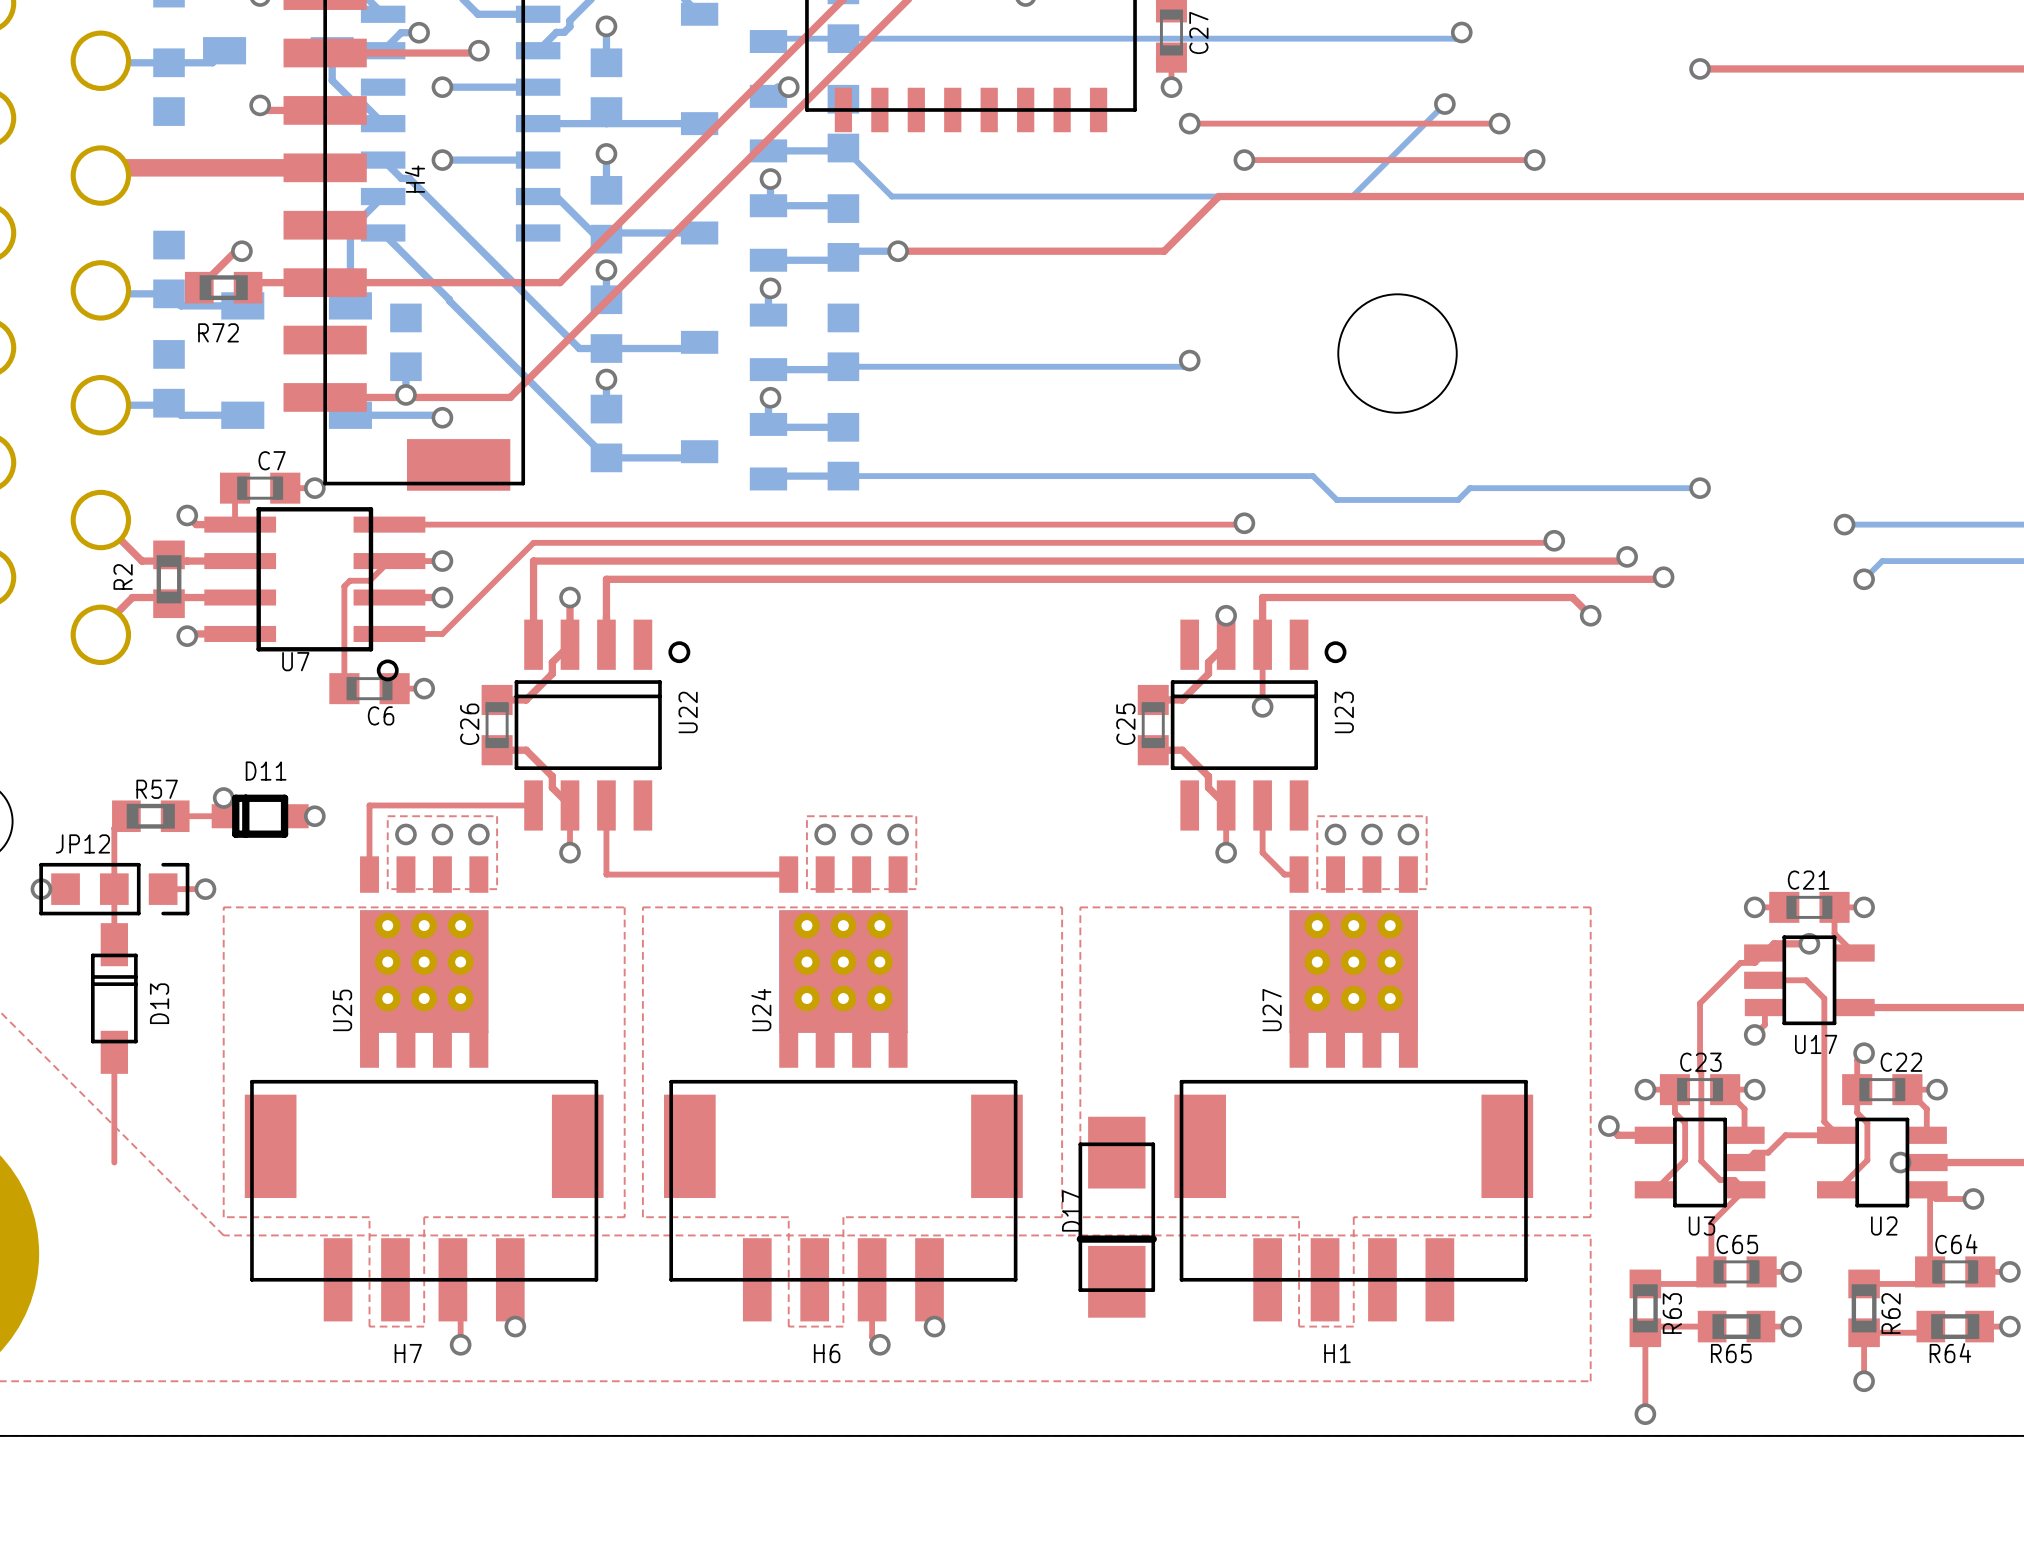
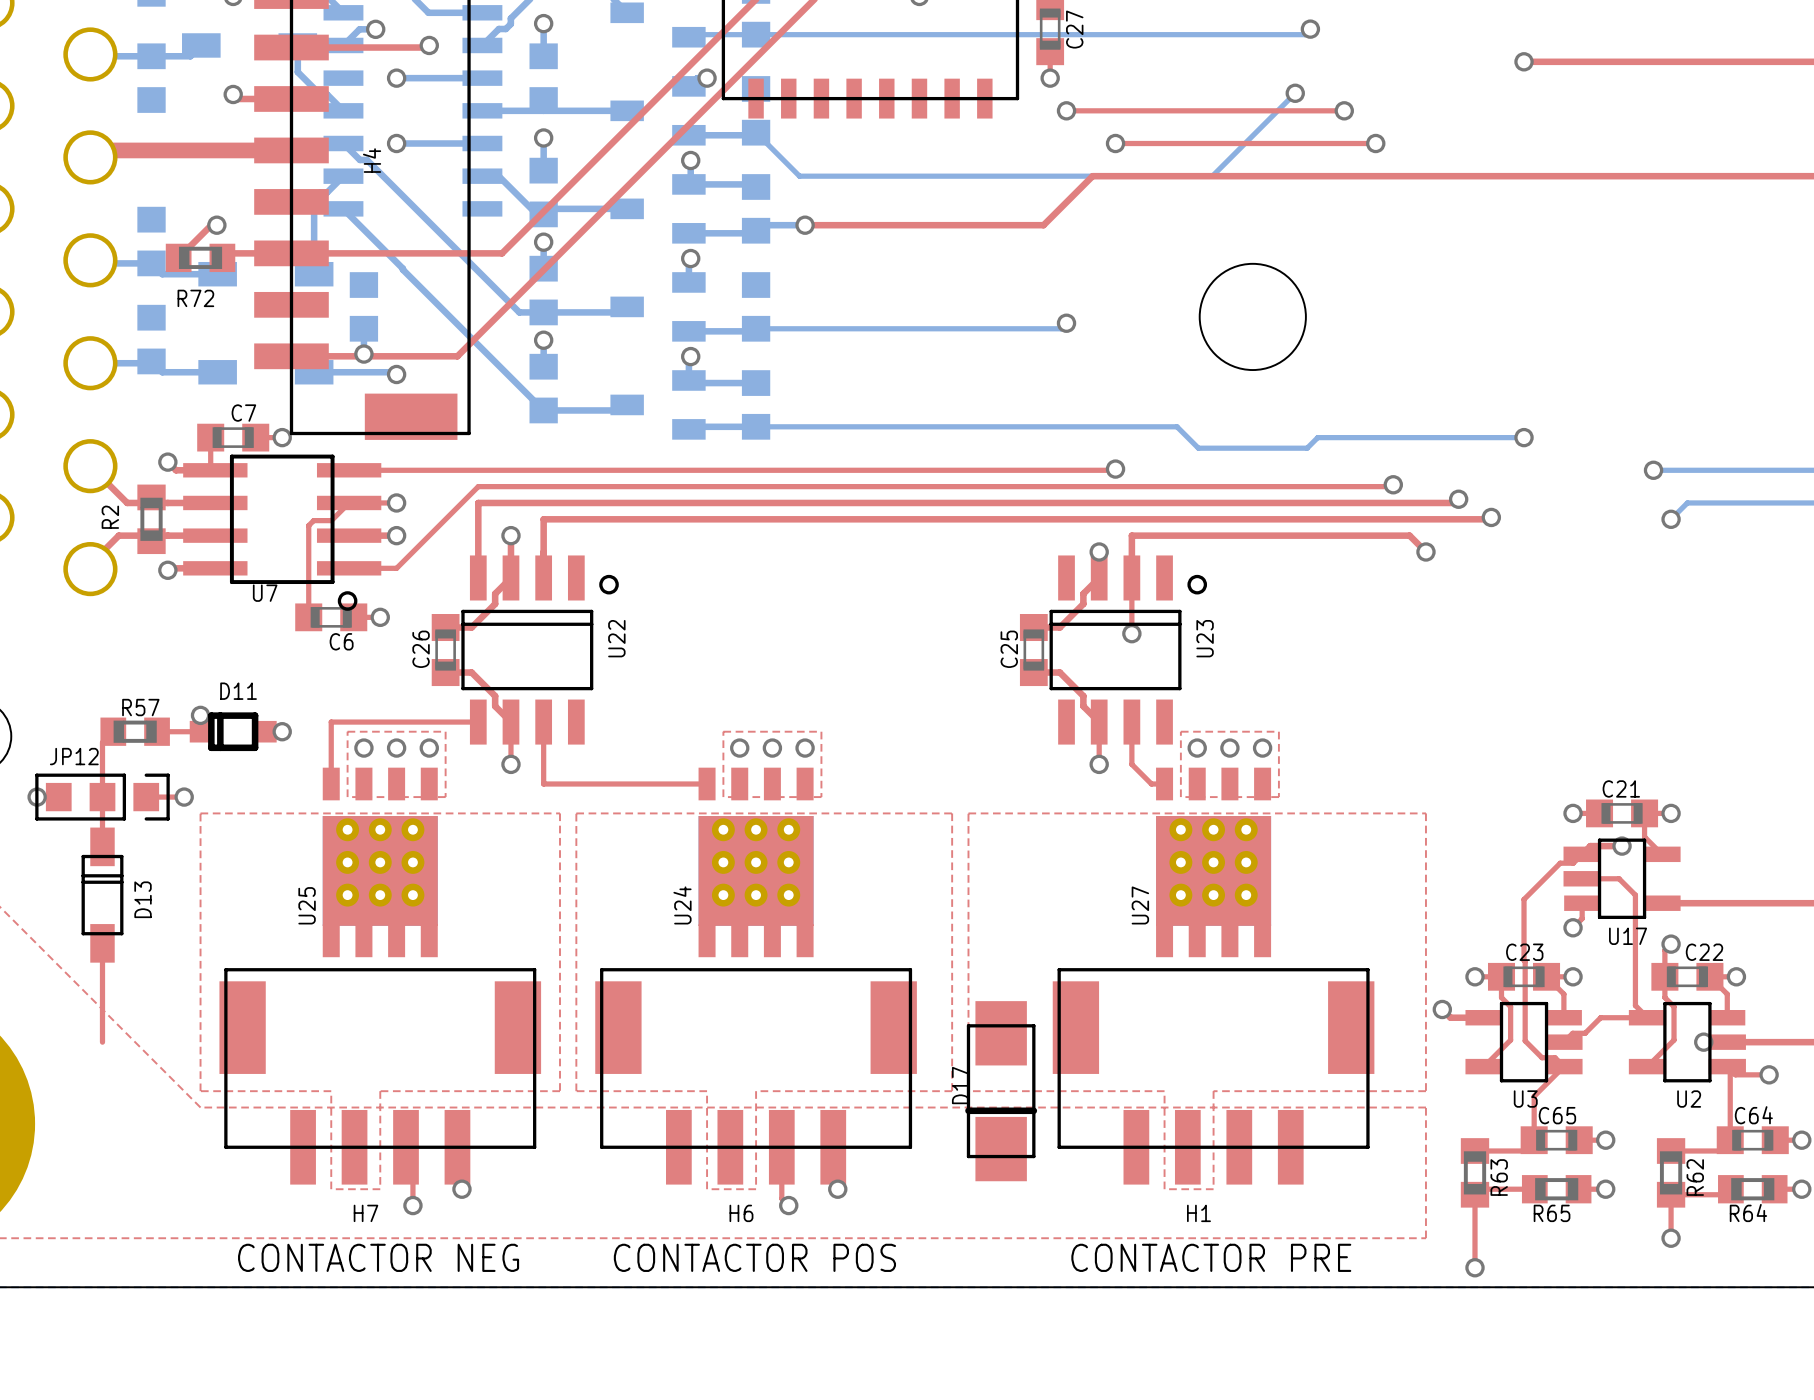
text: none -> CONTACTOR NEG (378, 1257)
text: none -> CONTACTOR POS (754, 1257)
text: none -> CONTACTOR PRE (1211, 1257)

